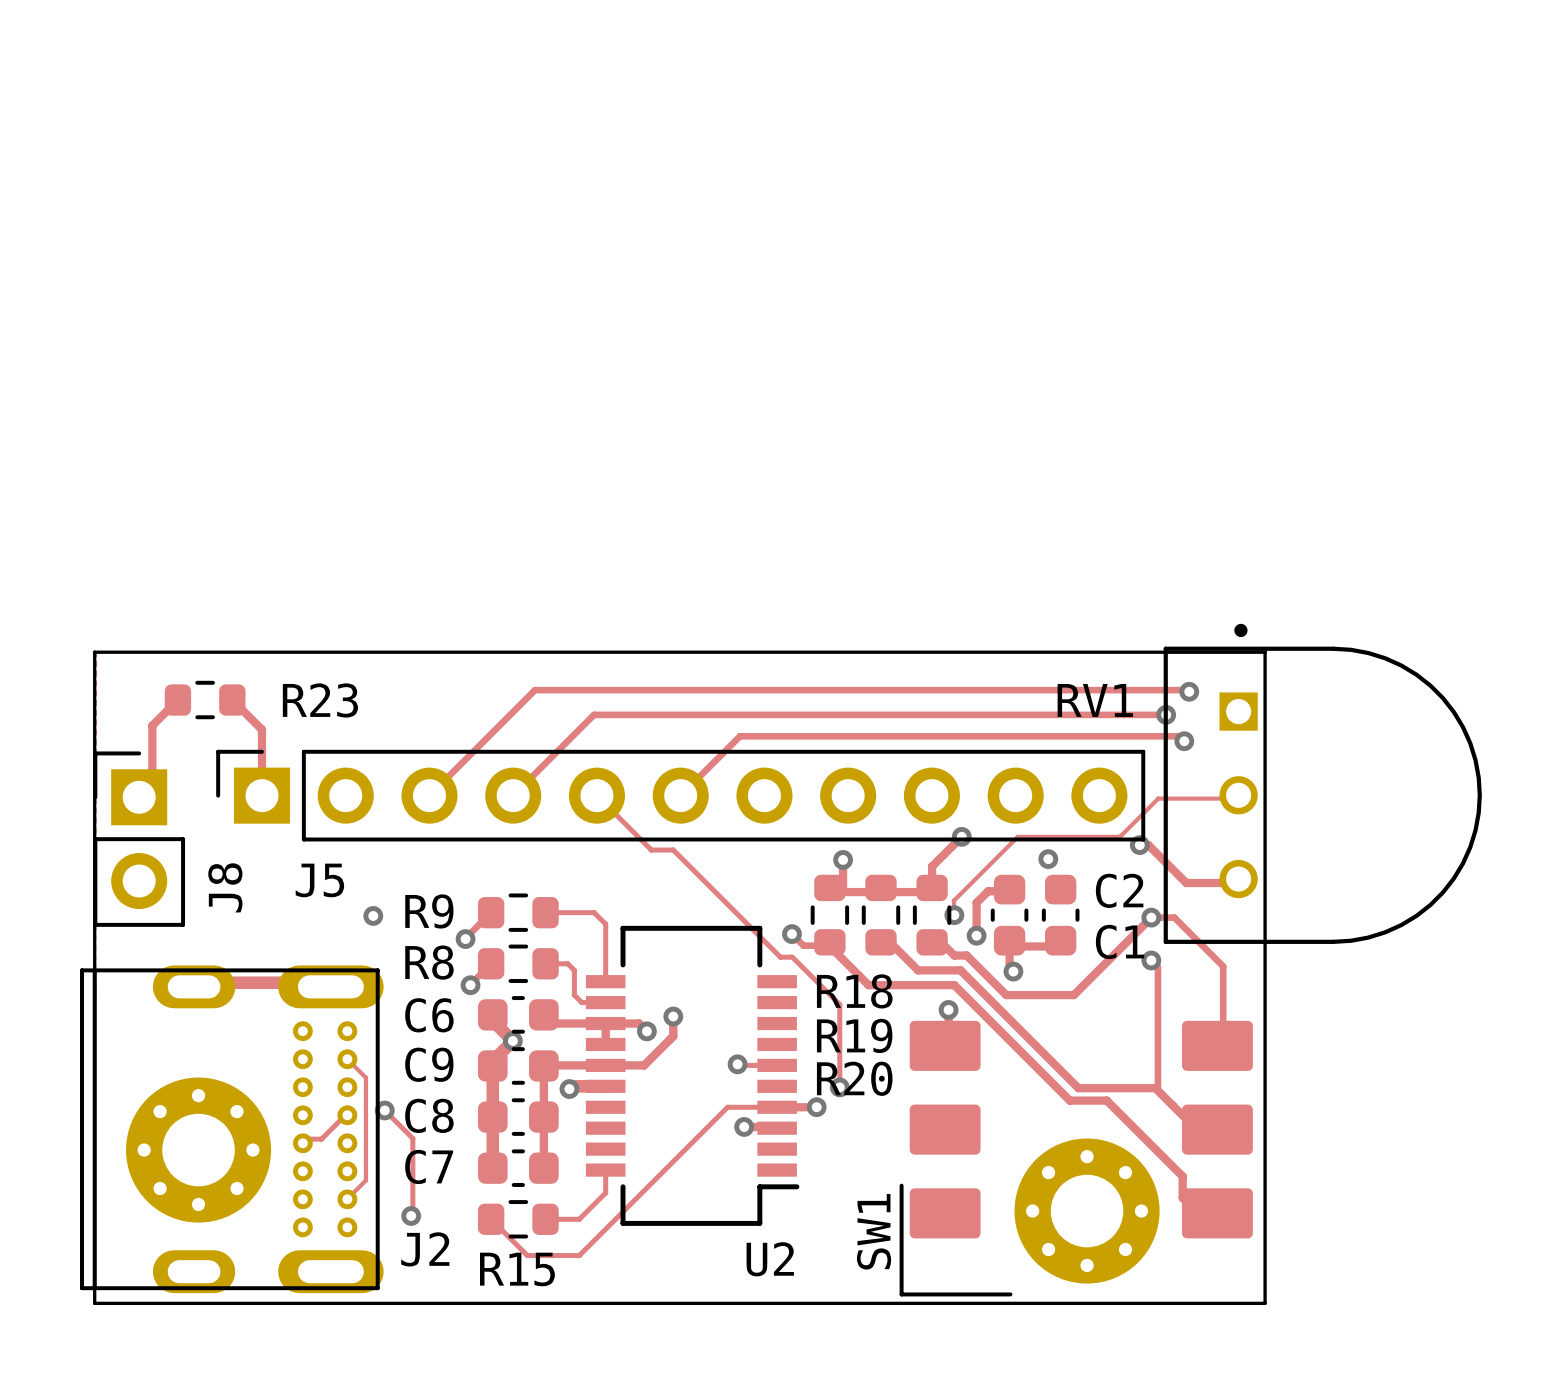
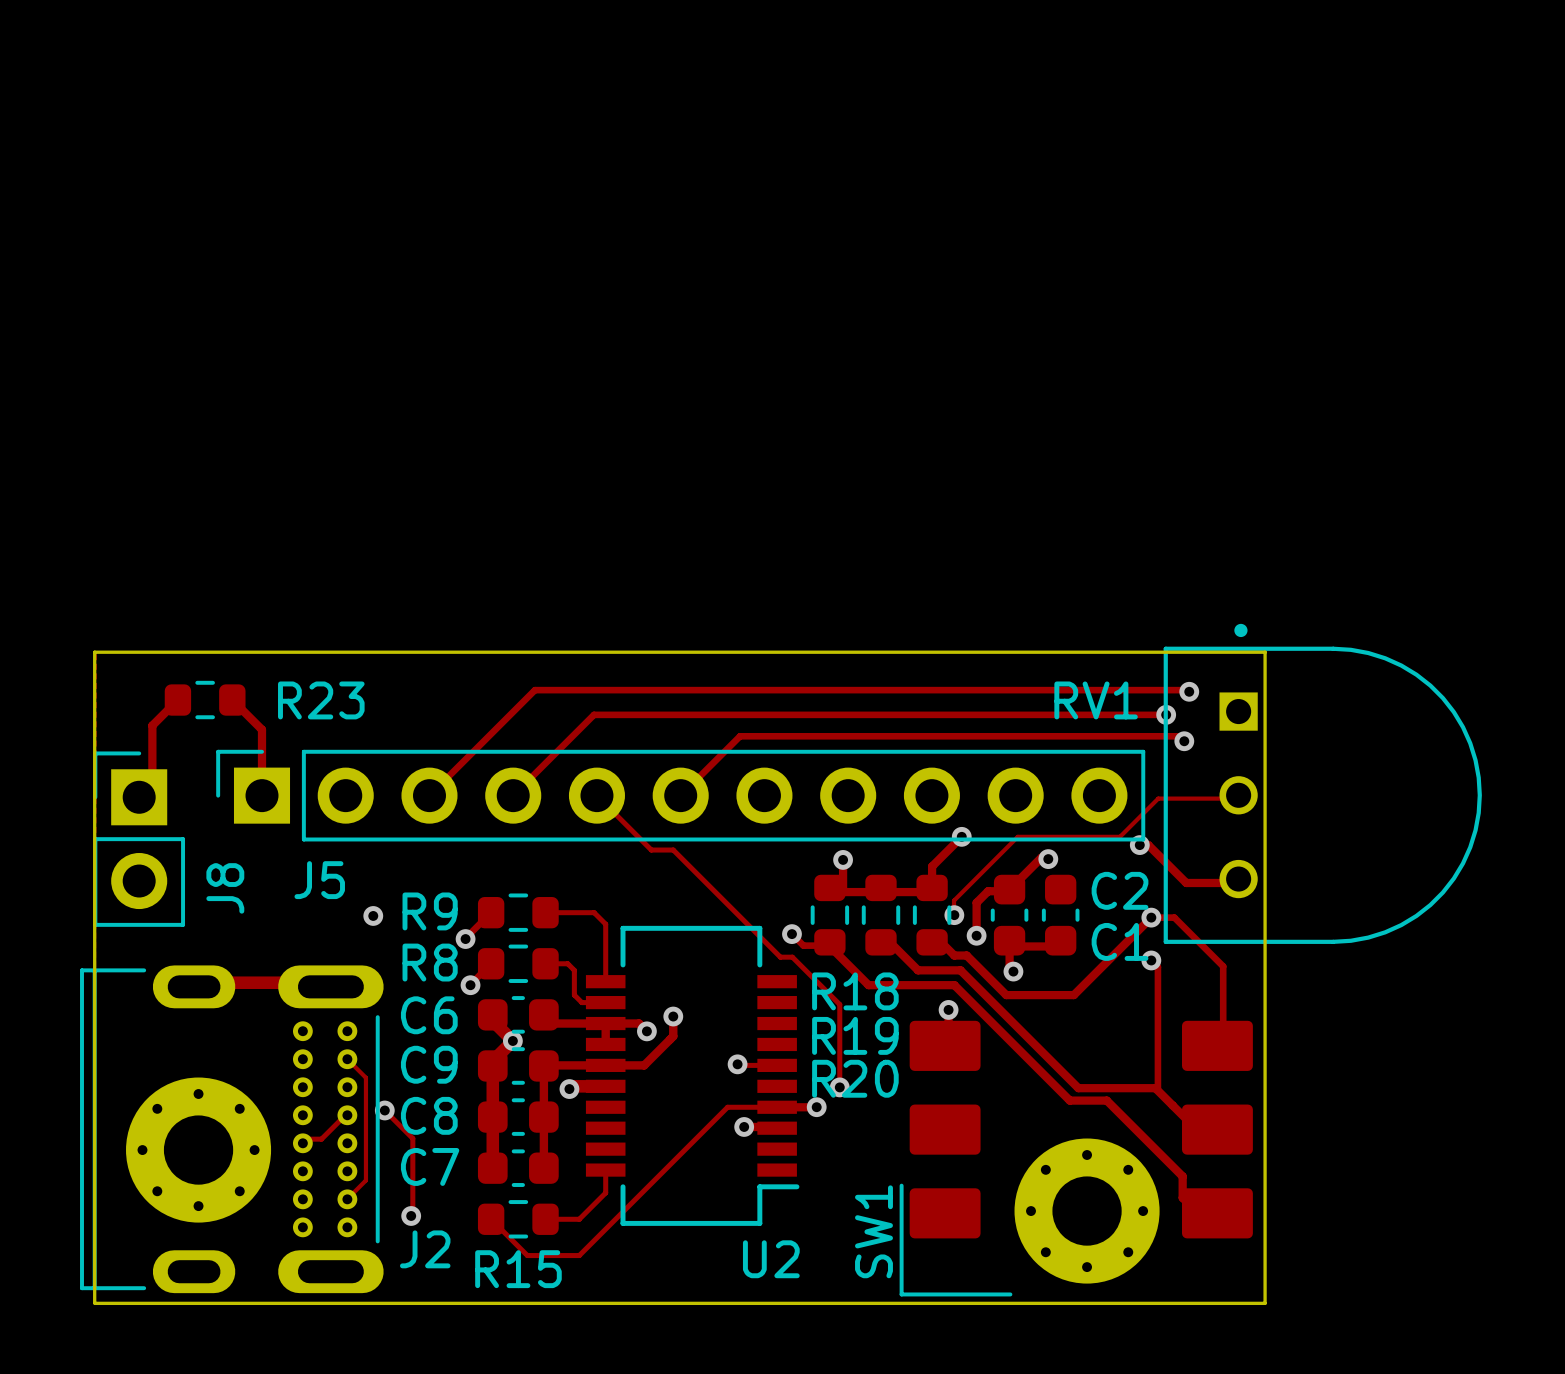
track: none -> (1048, 857) (1041, 857) (1009, 889)
J2 footprint: [80, 965, 384, 1294] -> [80, 965, 384, 1294]
part footprint: [126, 1077, 272, 1223] -> [126, 1077, 272, 1223]
part footprint: [1014, 1138, 1160, 1284] -> [1014, 1138, 1160, 1284]

